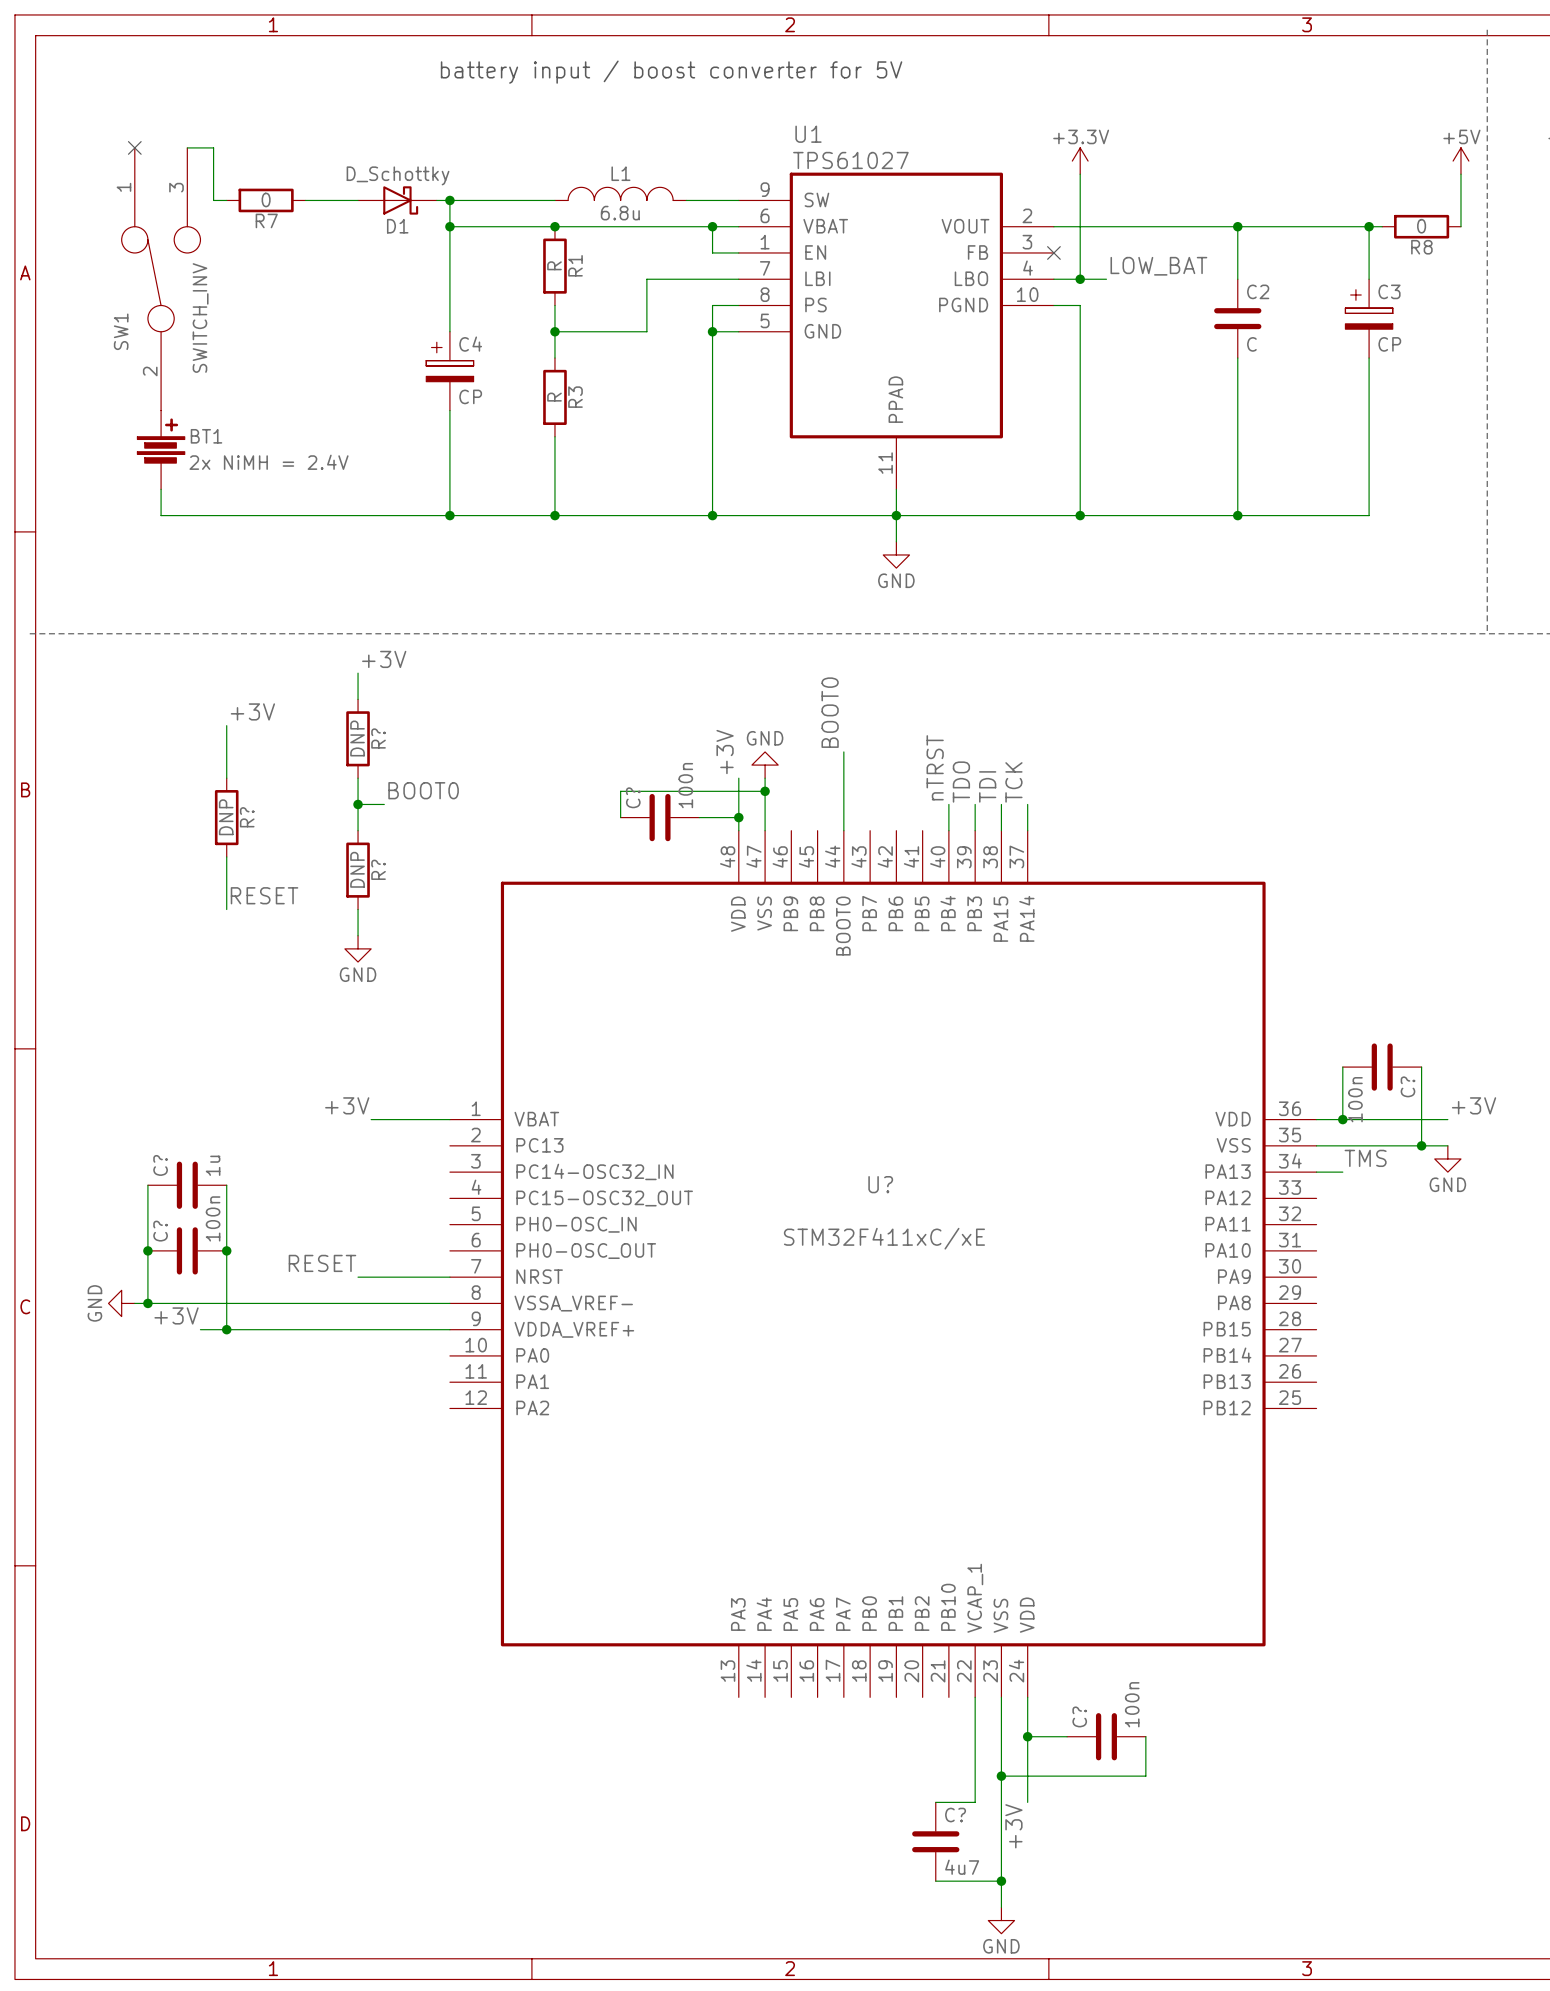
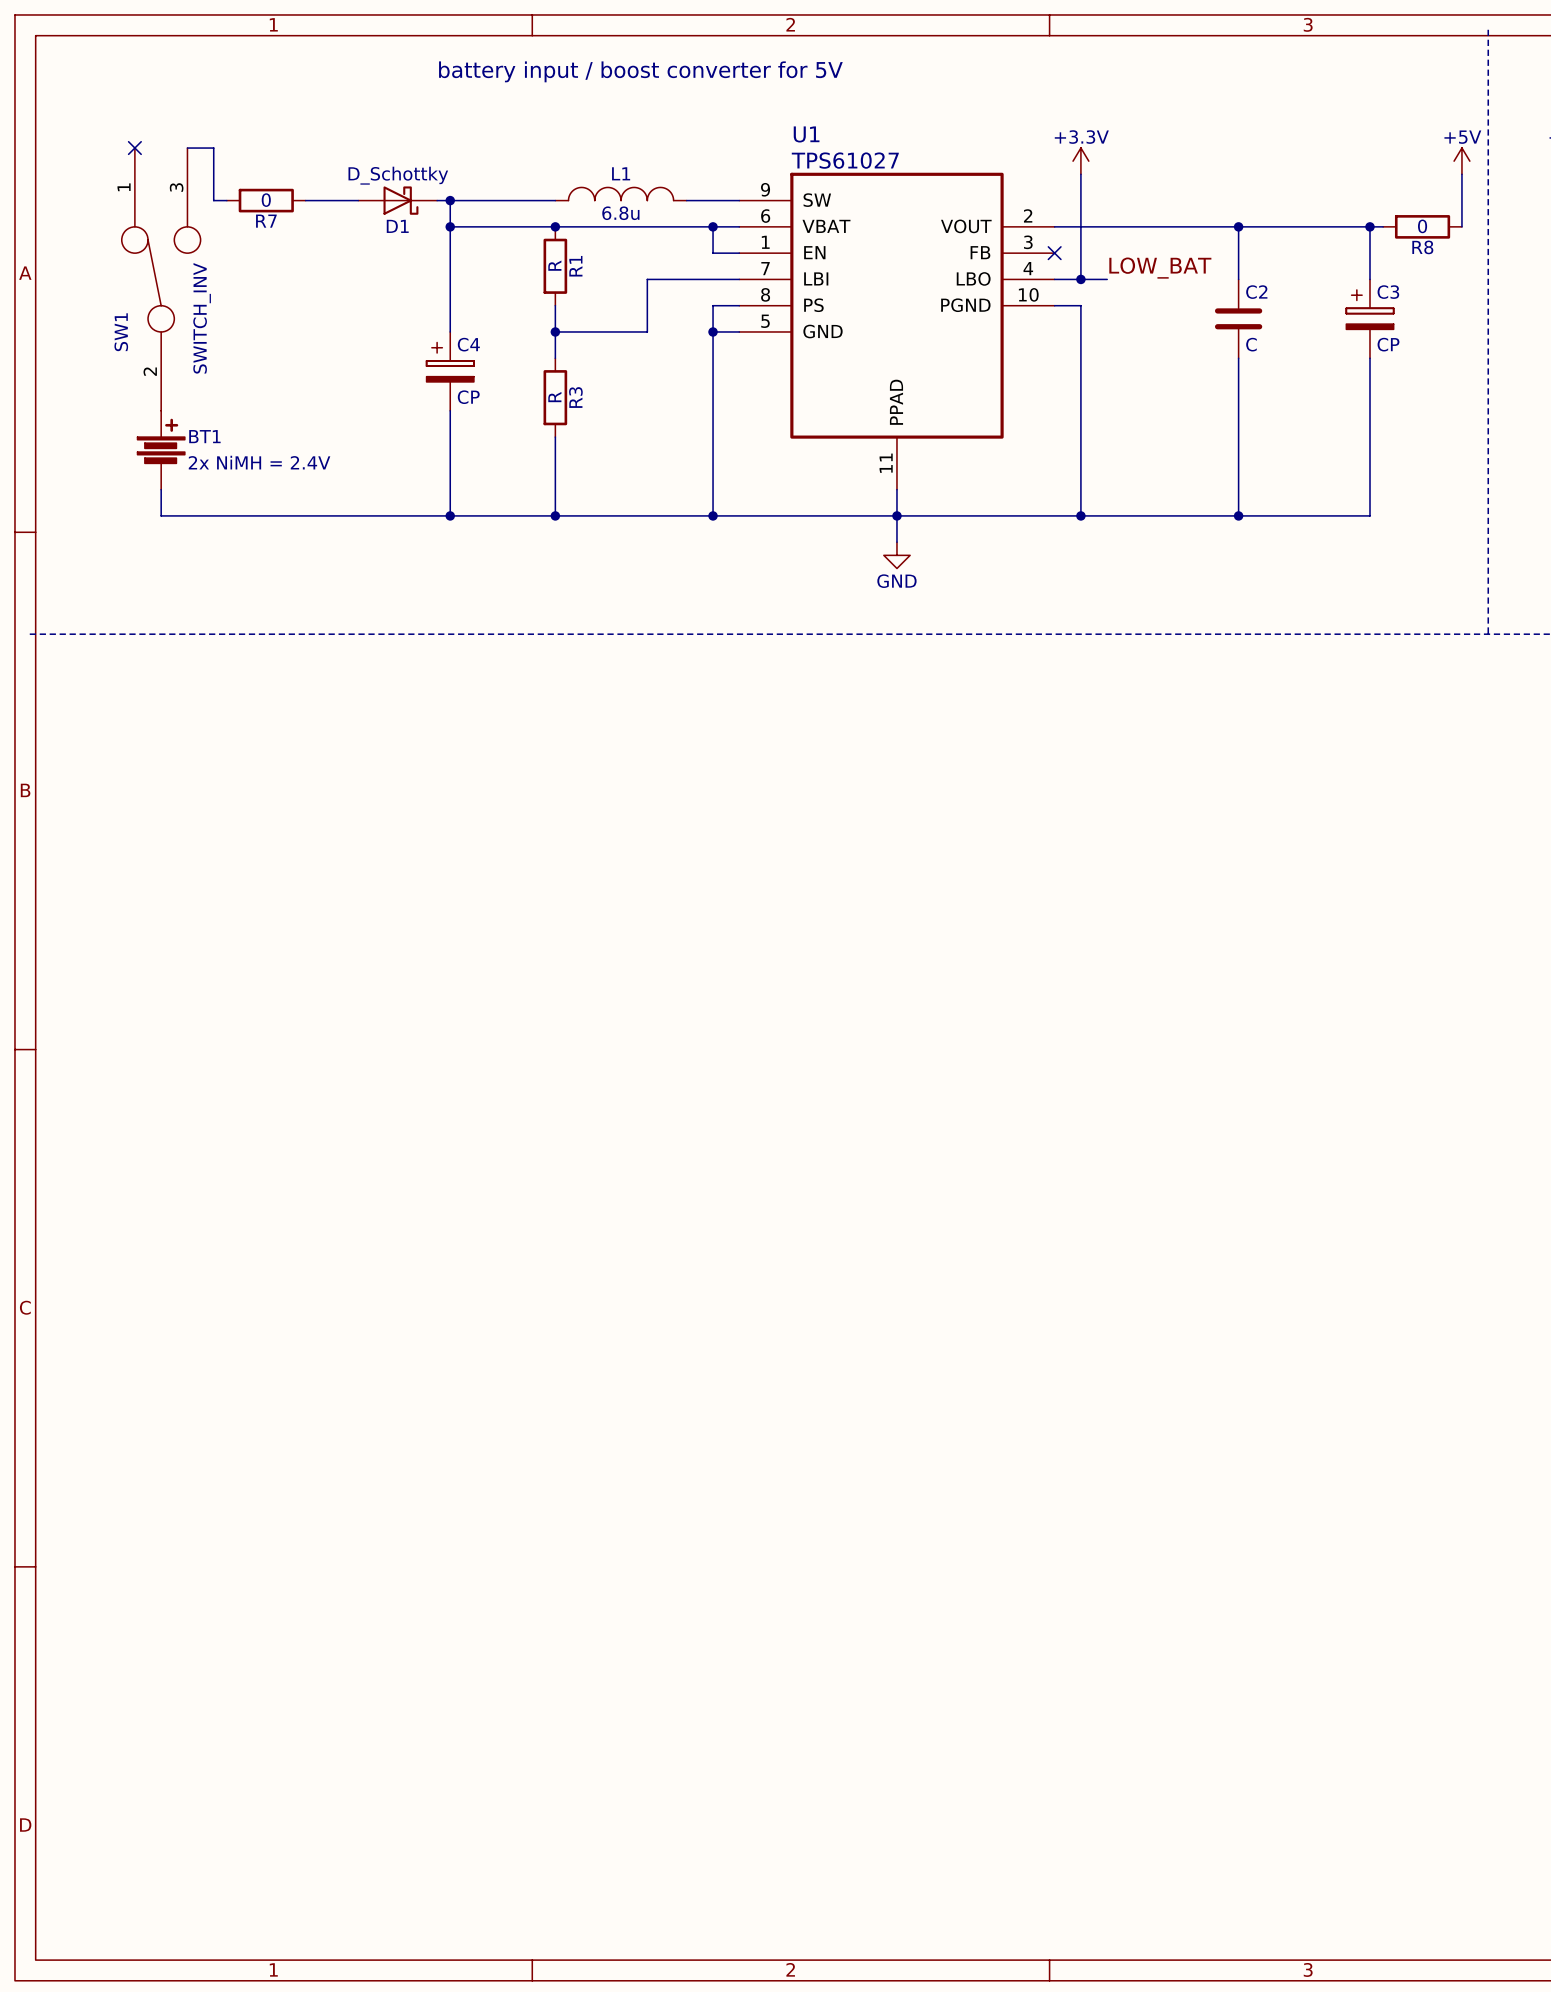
label: +3V (384, 659) -> none
wire: (358, 673) (358, 699) -> none
label: +3V (252, 711) -> none
label: BOOT0 (830, 712) -> none
wire: (226, 725) (226, 778) -> none
R?: DNP (358, 738) -> none
wire: (843, 751) (843, 830) -> none
label: +3V (725, 752) -> none
power symbol: GND (765, 765) -> none
label: nTRST (935, 767) -> none
wire: (358, 778) (358, 830) -> none
wire: (738, 778) (738, 830) -> none
wire: (765, 778) (765, 830) -> none
label: TDO (961, 782) -> none
label: TCK (1013, 782) -> none
label: TDI (987, 786) -> none
label: BOOT0 (423, 790) -> none
wire: (765, 791) (620, 791) (620, 817) -> none
junction: (765, 791) -> none
wire: (358, 804) (384, 804) -> none
junction: (358, 804) -> none
wire: (948, 804) (948, 830) -> none
wire: (975, 804) (975, 830) -> none
wire: (1001, 804) (1001, 830) -> none
wire: (1027, 804) (1027, 830) -> none
R?: DNP (226, 817) -> none
C?: 100n (660, 817) -> none
wire: (699, 817) (738, 817) -> none
junction: (738, 817) -> none
wire: (226, 856) (226, 909) -> none
R?: DNP (358, 870) -> none
label: RESET (264, 895) -> none
wire: (358, 909) (358, 935) -> none
power symbol: GND (358, 948) -> none
wire: (1342, 1067) (1342, 1119) -> none
C?: 100n (1382, 1067) -> none
wire: (1421, 1067) (1421, 1145) -> none
label: +3V (347, 1105) -> none
label: +3V (1474, 1105) -> none
wire: (371, 1119) (449, 1119) -> none
wire: (1316, 1119) (1447, 1119) -> none
junction: (1342, 1119) -> none
wire: (1316, 1145) (1447, 1145) -> none
junction: (1421, 1145) -> none
label: TMS (1365, 1158) -> none
power symbol: GND (1447, 1158) -> none
wire: (1316, 1172) (1342, 1172) -> none
wire: (147, 1185) (147, 1303) -> none
C?: 1u (187, 1185) -> none
wire: (226, 1185) (226, 1329) -> none
junction: (147, 1250) -> none
C?: 100n (187, 1250) -> none
junction: (226, 1250) -> none
label: RESET (322, 1263) -> none
U?: STM32F411xC/xE (883, 1264) -> none
wire: (358, 1277) (449, 1277) -> none
power symbol: GND (121, 1303) -> none
wire: (134, 1303) (449, 1303) -> none
junction: (147, 1303) -> none
label: +3V (176, 1315) -> none
wire: (200, 1329) (449, 1329) -> none
junction: (226, 1329) -> none
wire: (975, 1697) (975, 1802) (935, 1802) -> none
wire: (1001, 1697) (1001, 1907) -> none
wire: (1027, 1697) (1027, 1802) -> none
wire: (1027, 1736) (1067, 1736) -> none
junction: (1027, 1736) -> none
C?: 100n (1106, 1736) -> none
wire: (1145, 1736) (1145, 1776) (1001, 1776) -> none
junction: (1001, 1776) -> none
label: +3V (1013, 1826) -> none
C?: 4u7 (935, 1841) -> none
wire: (935, 1881) (1001, 1881) -> none
junction: (1001, 1881) -> none
power symbol: GND (1001, 1920) -> none

